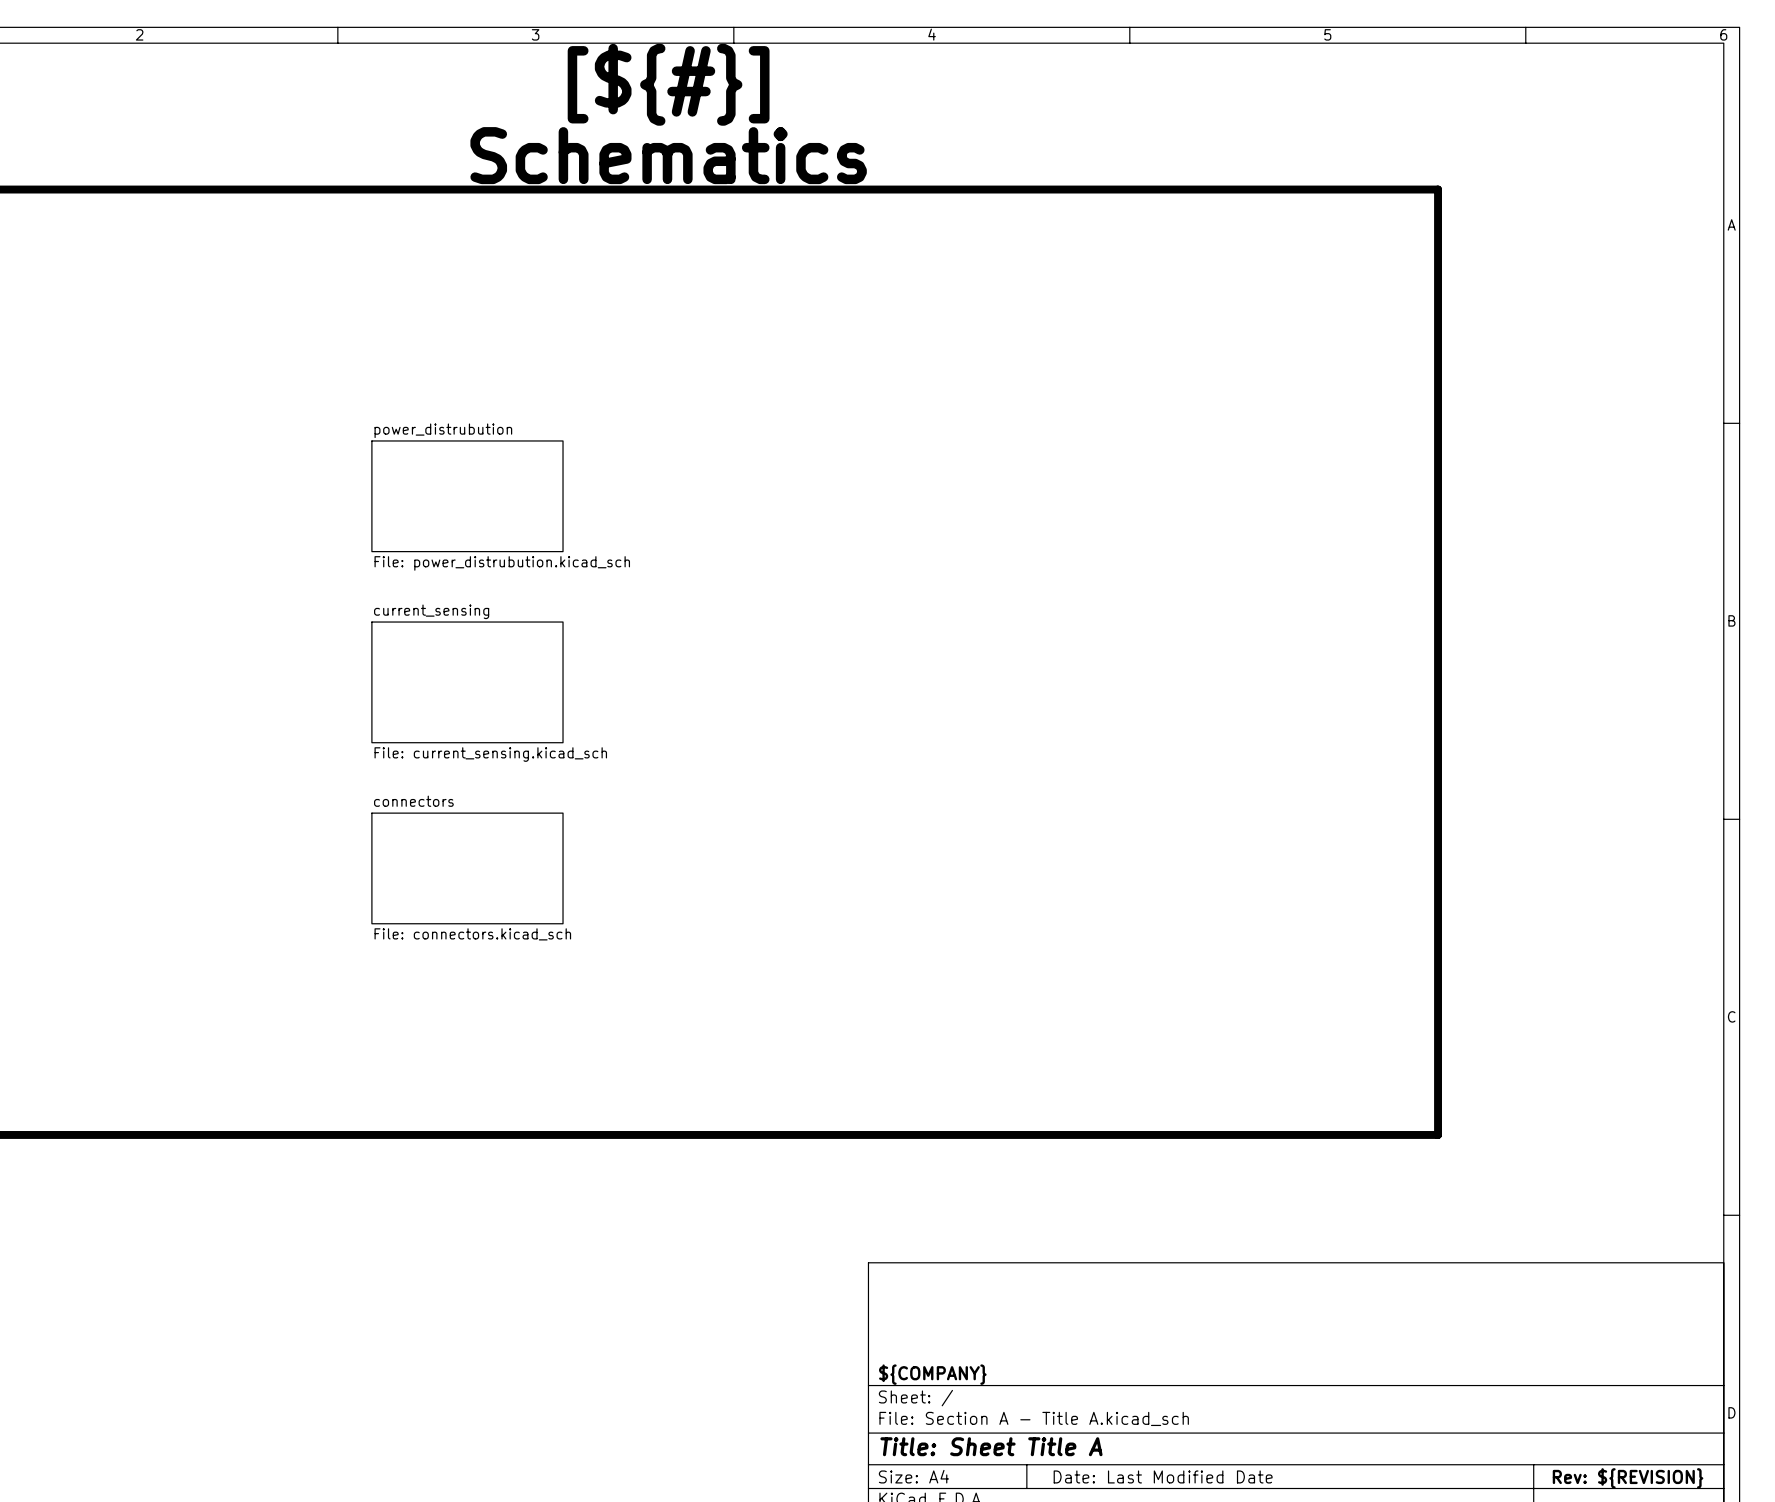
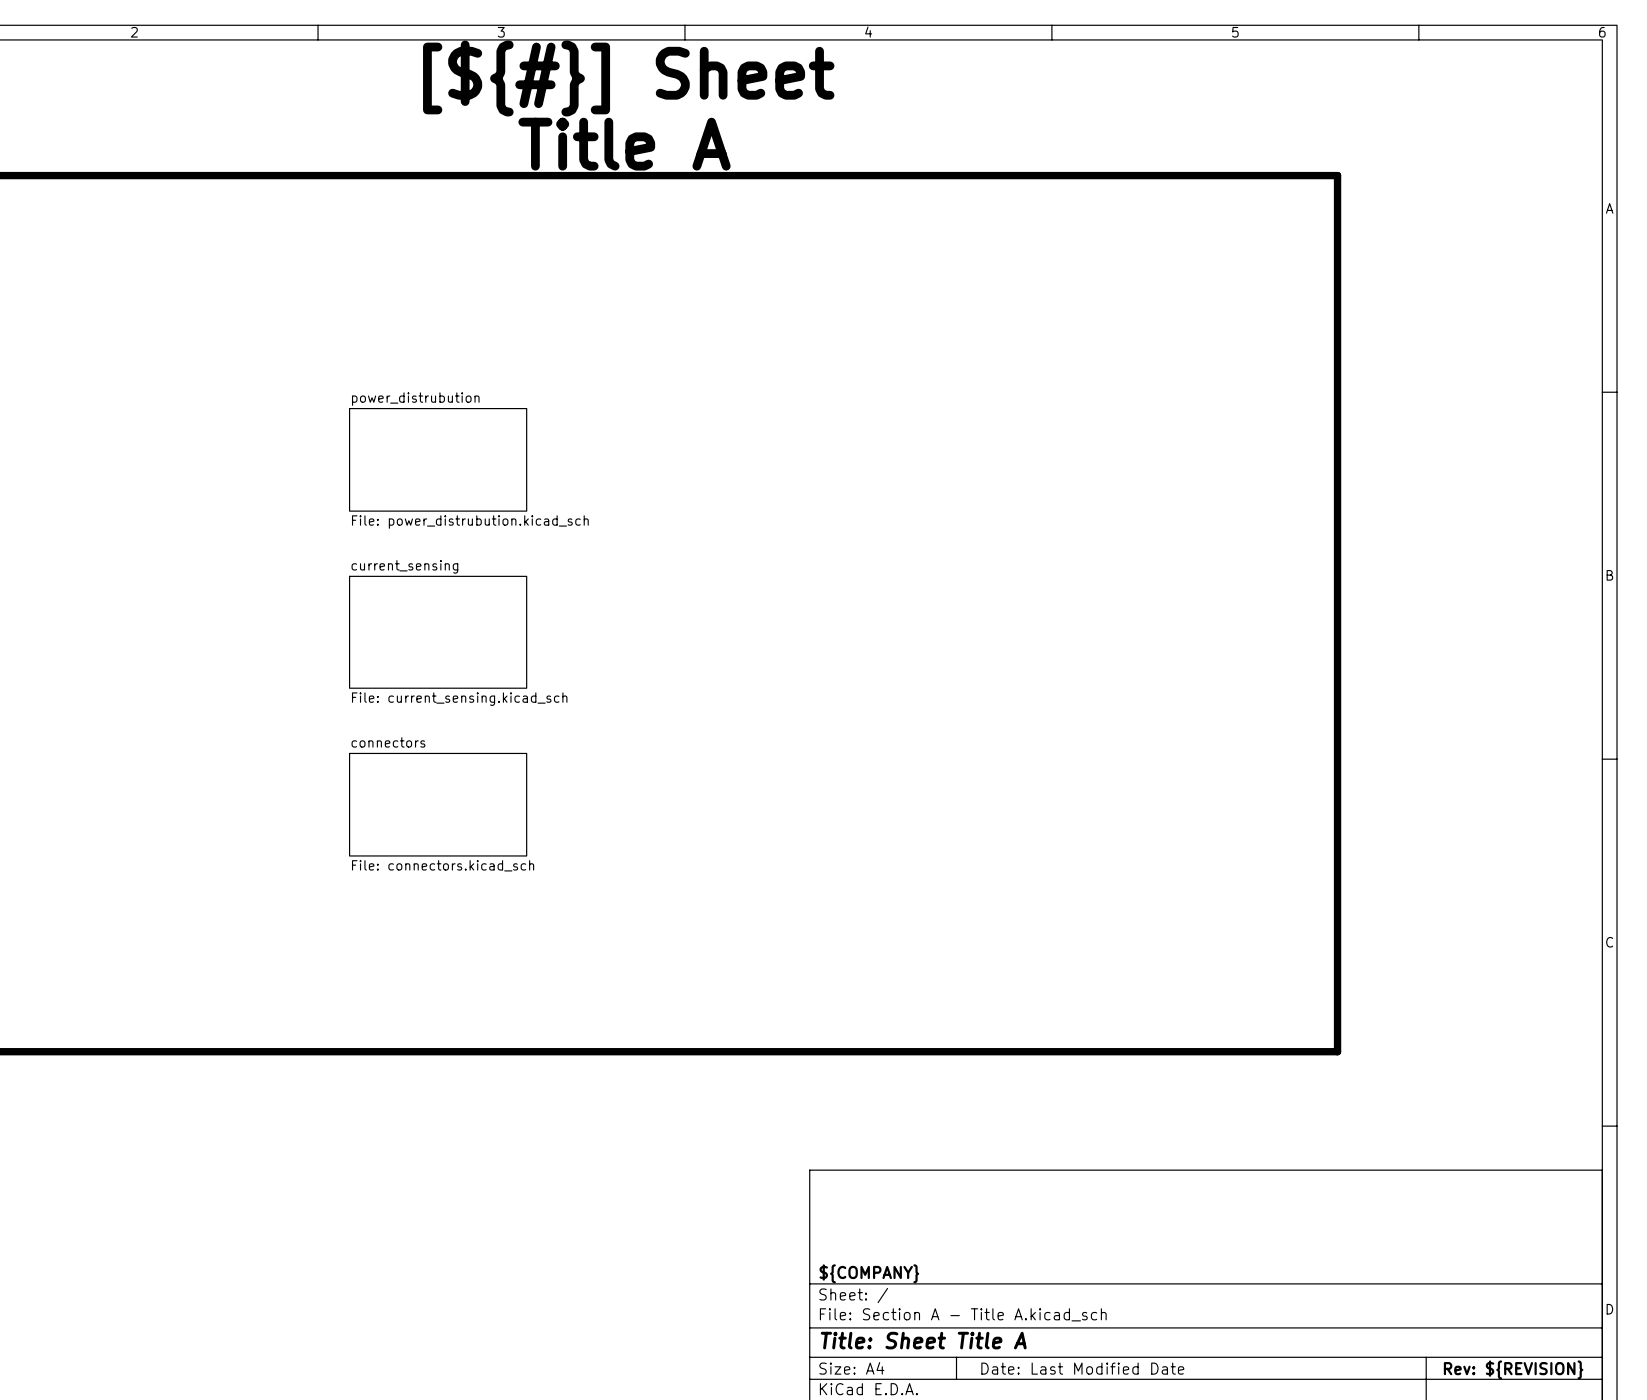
text: [${#}] (668, 84) -> [${#}] Sheet (628, 78)
text: Schematics (668, 155) -> Title A (624, 144)

